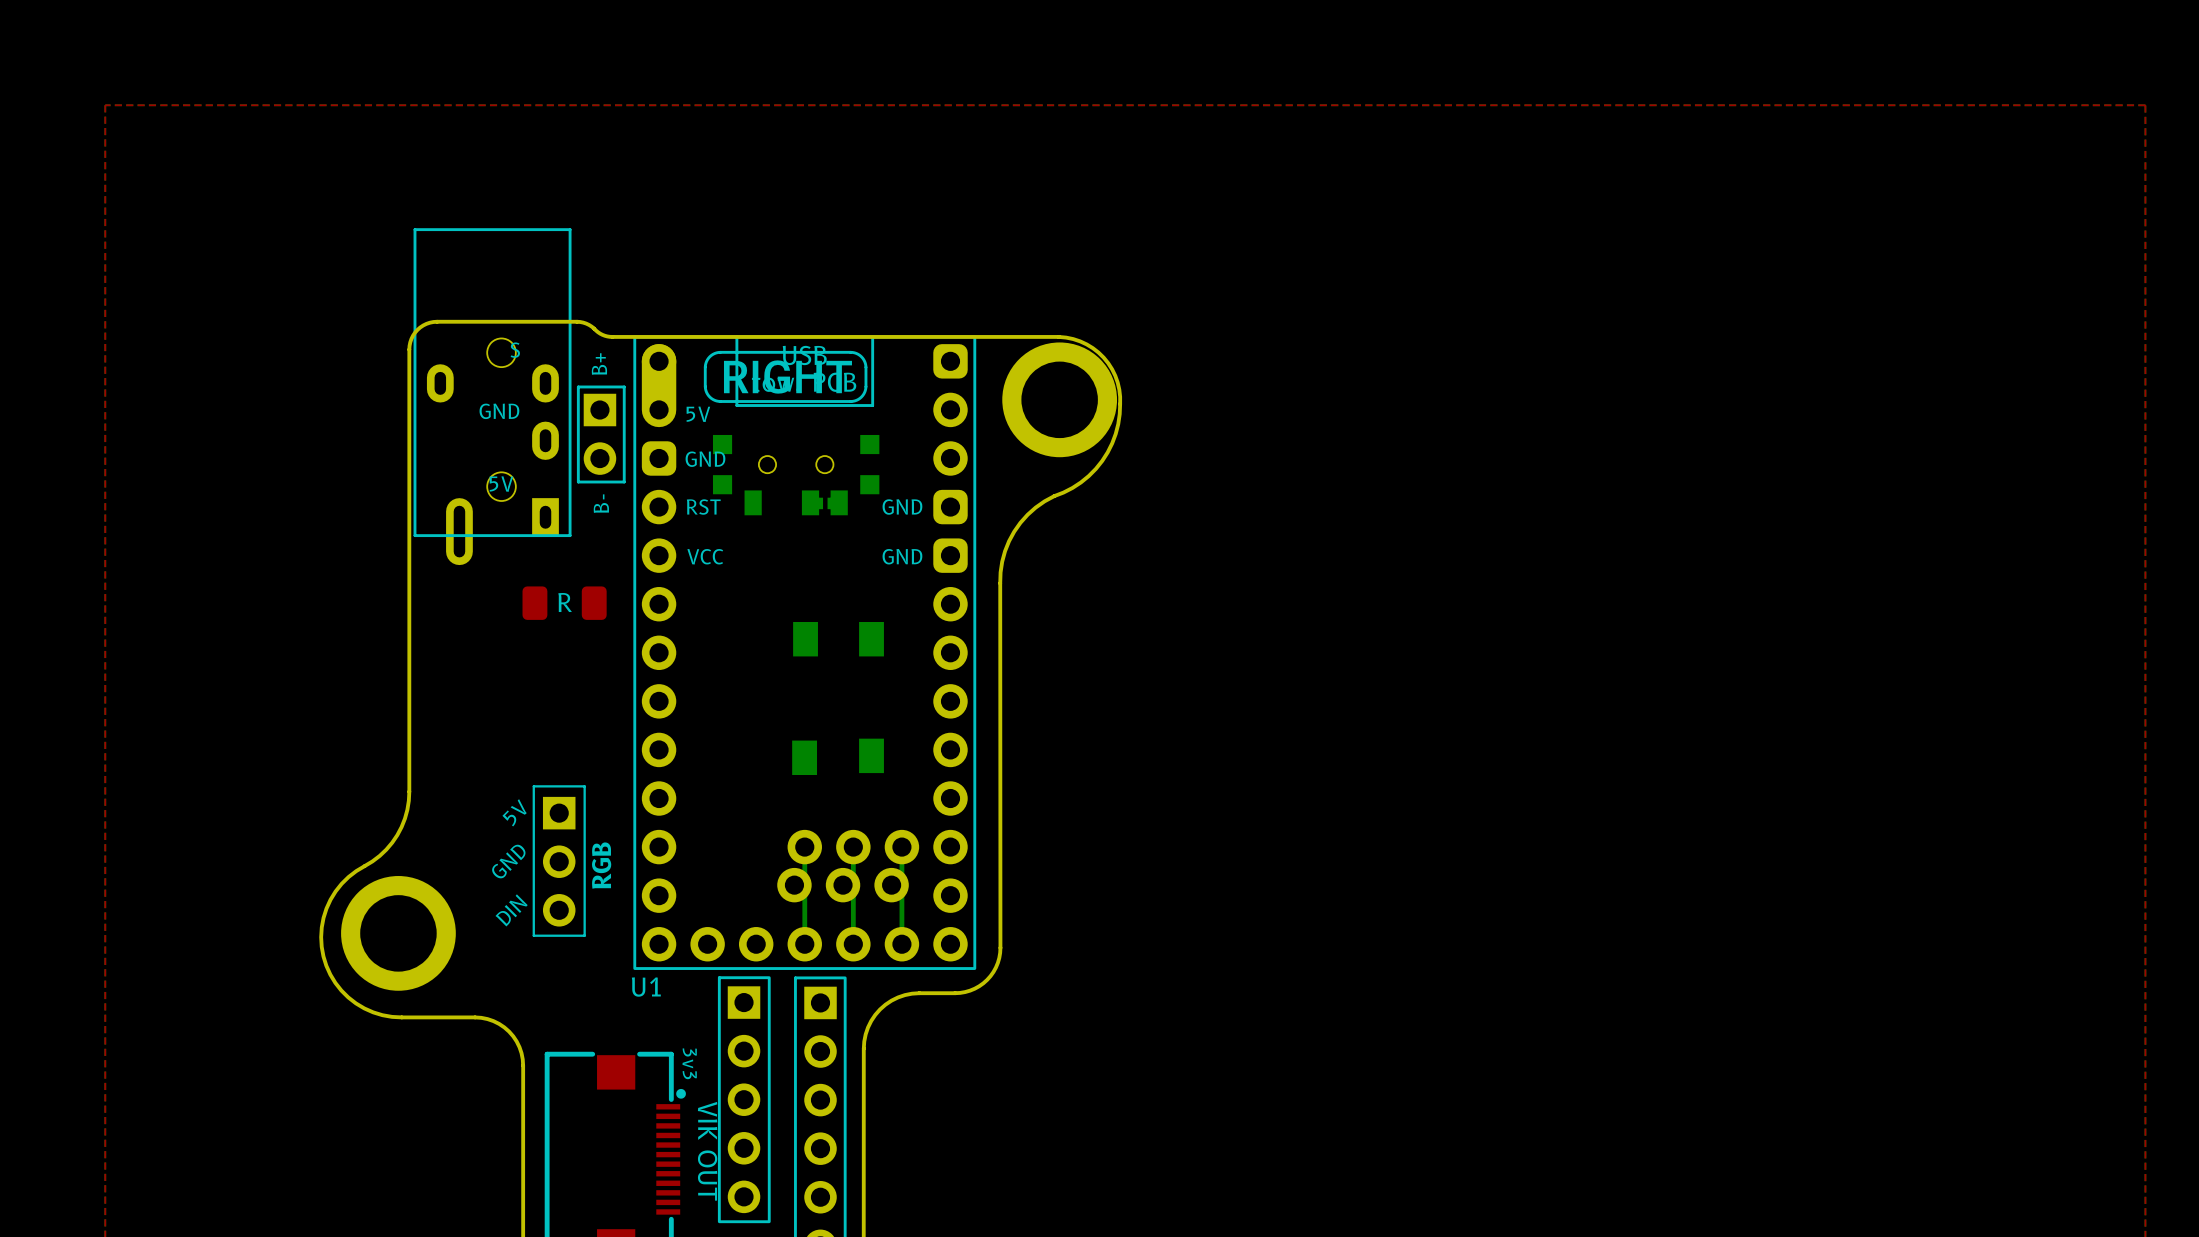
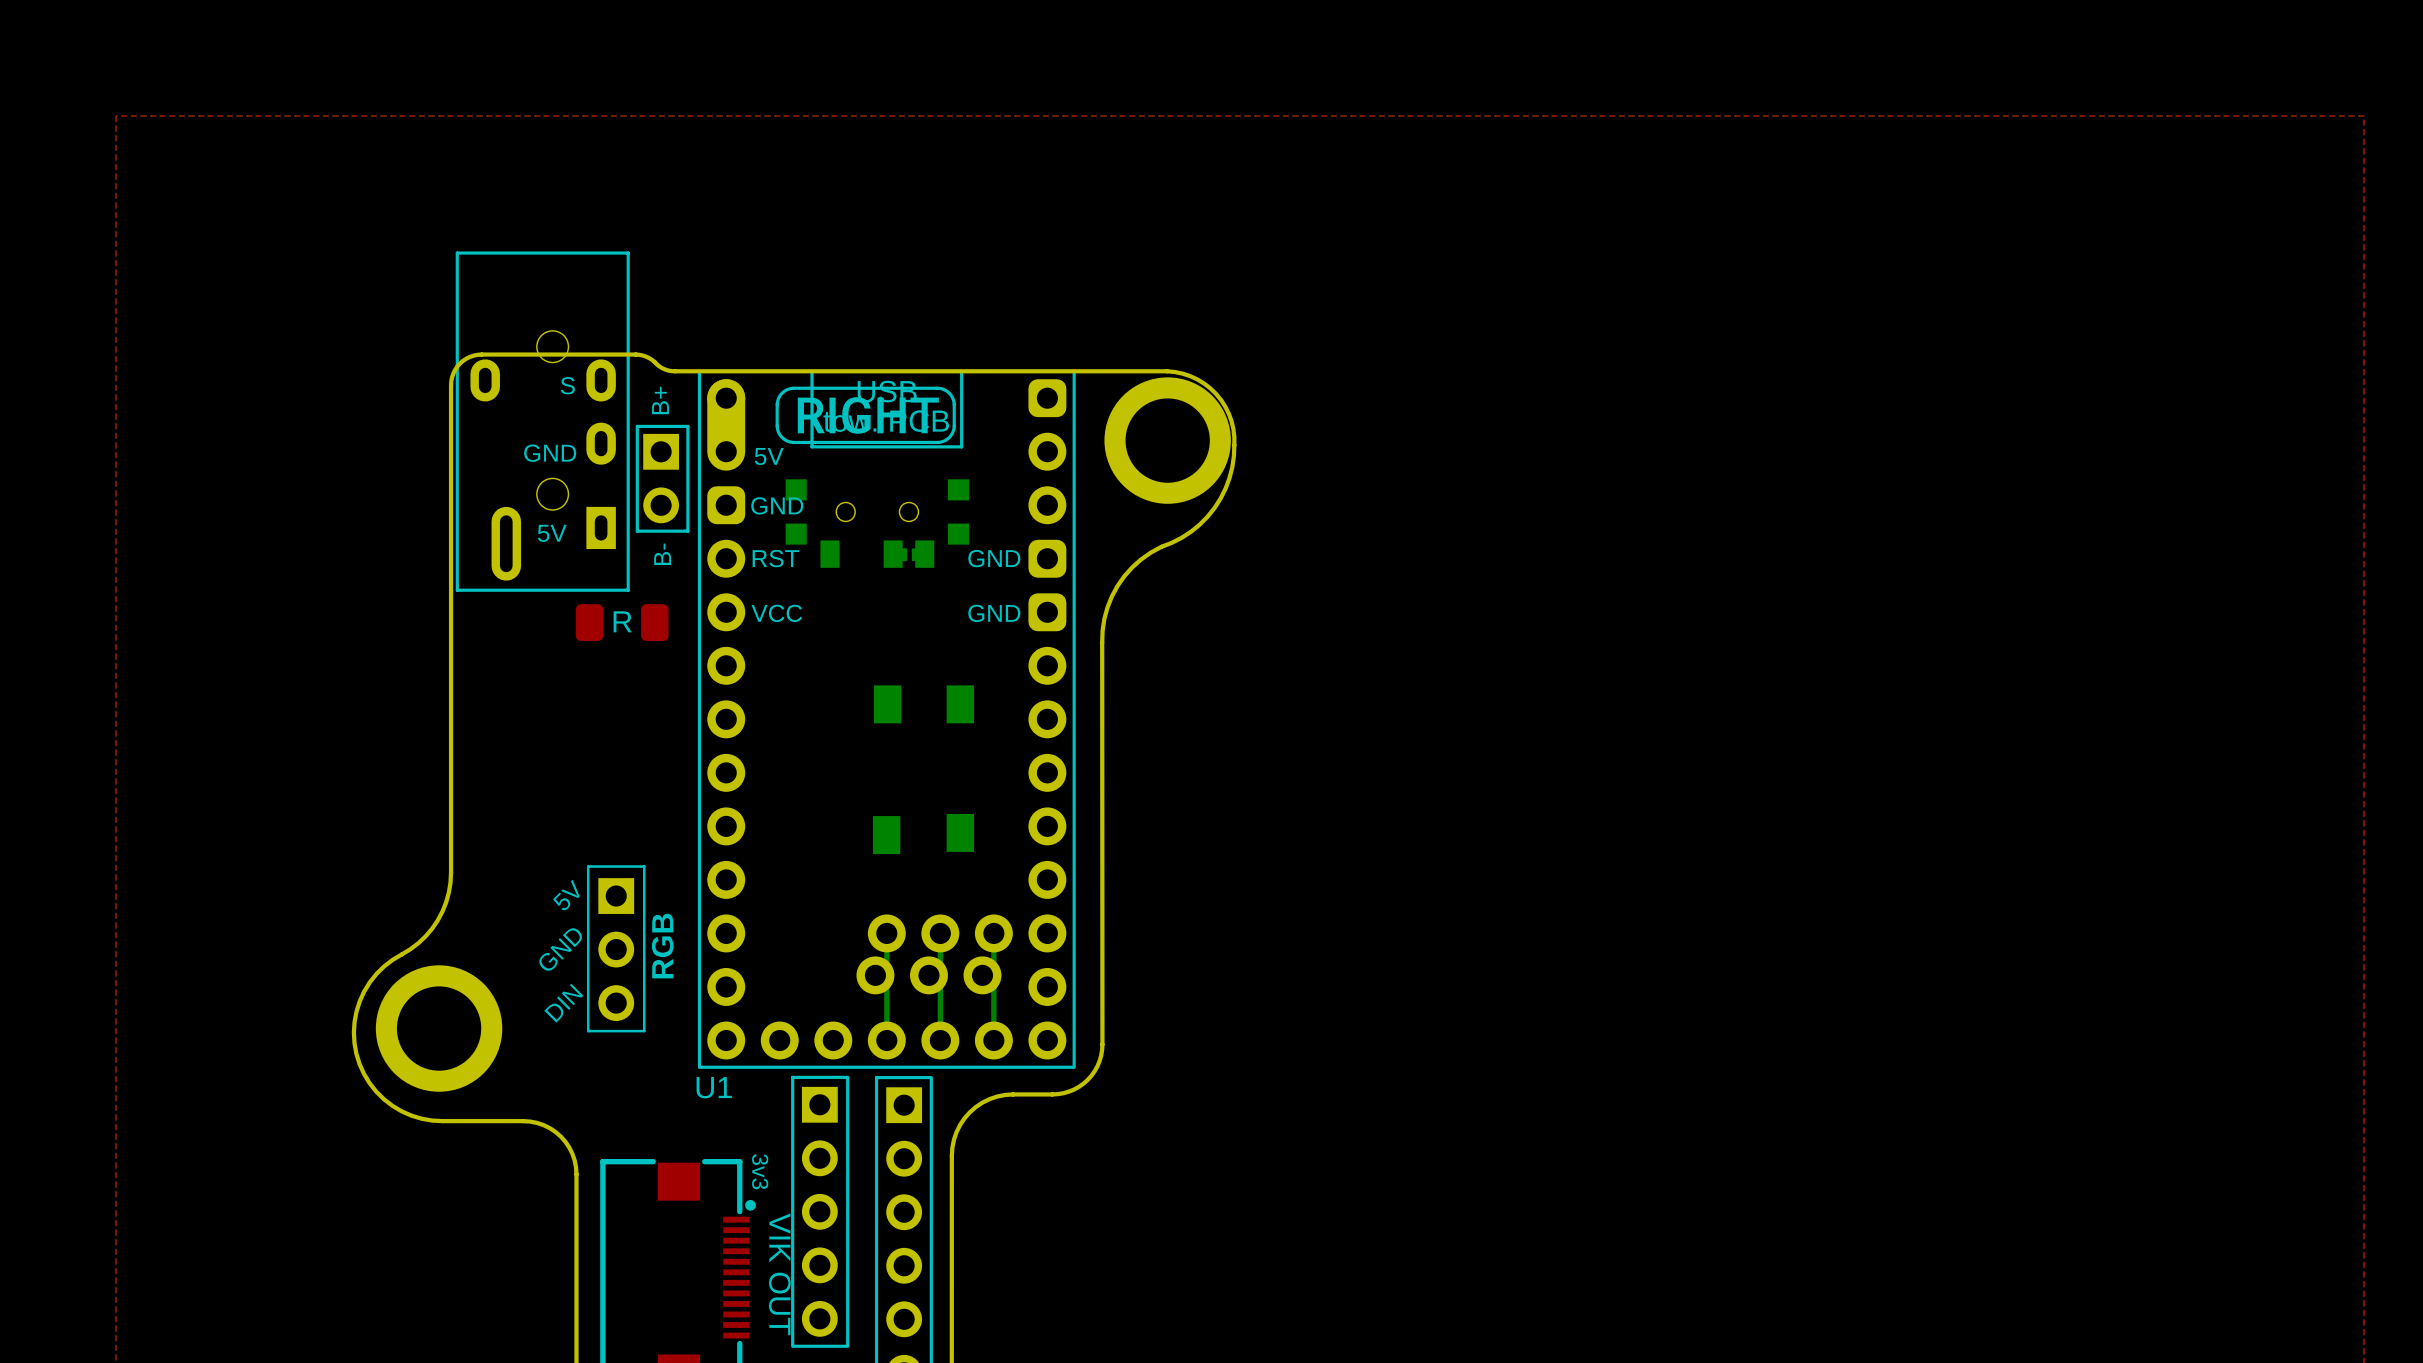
part position: (492, 451) -> (543, 455)
part position: (564, 603) -> (622, 622)

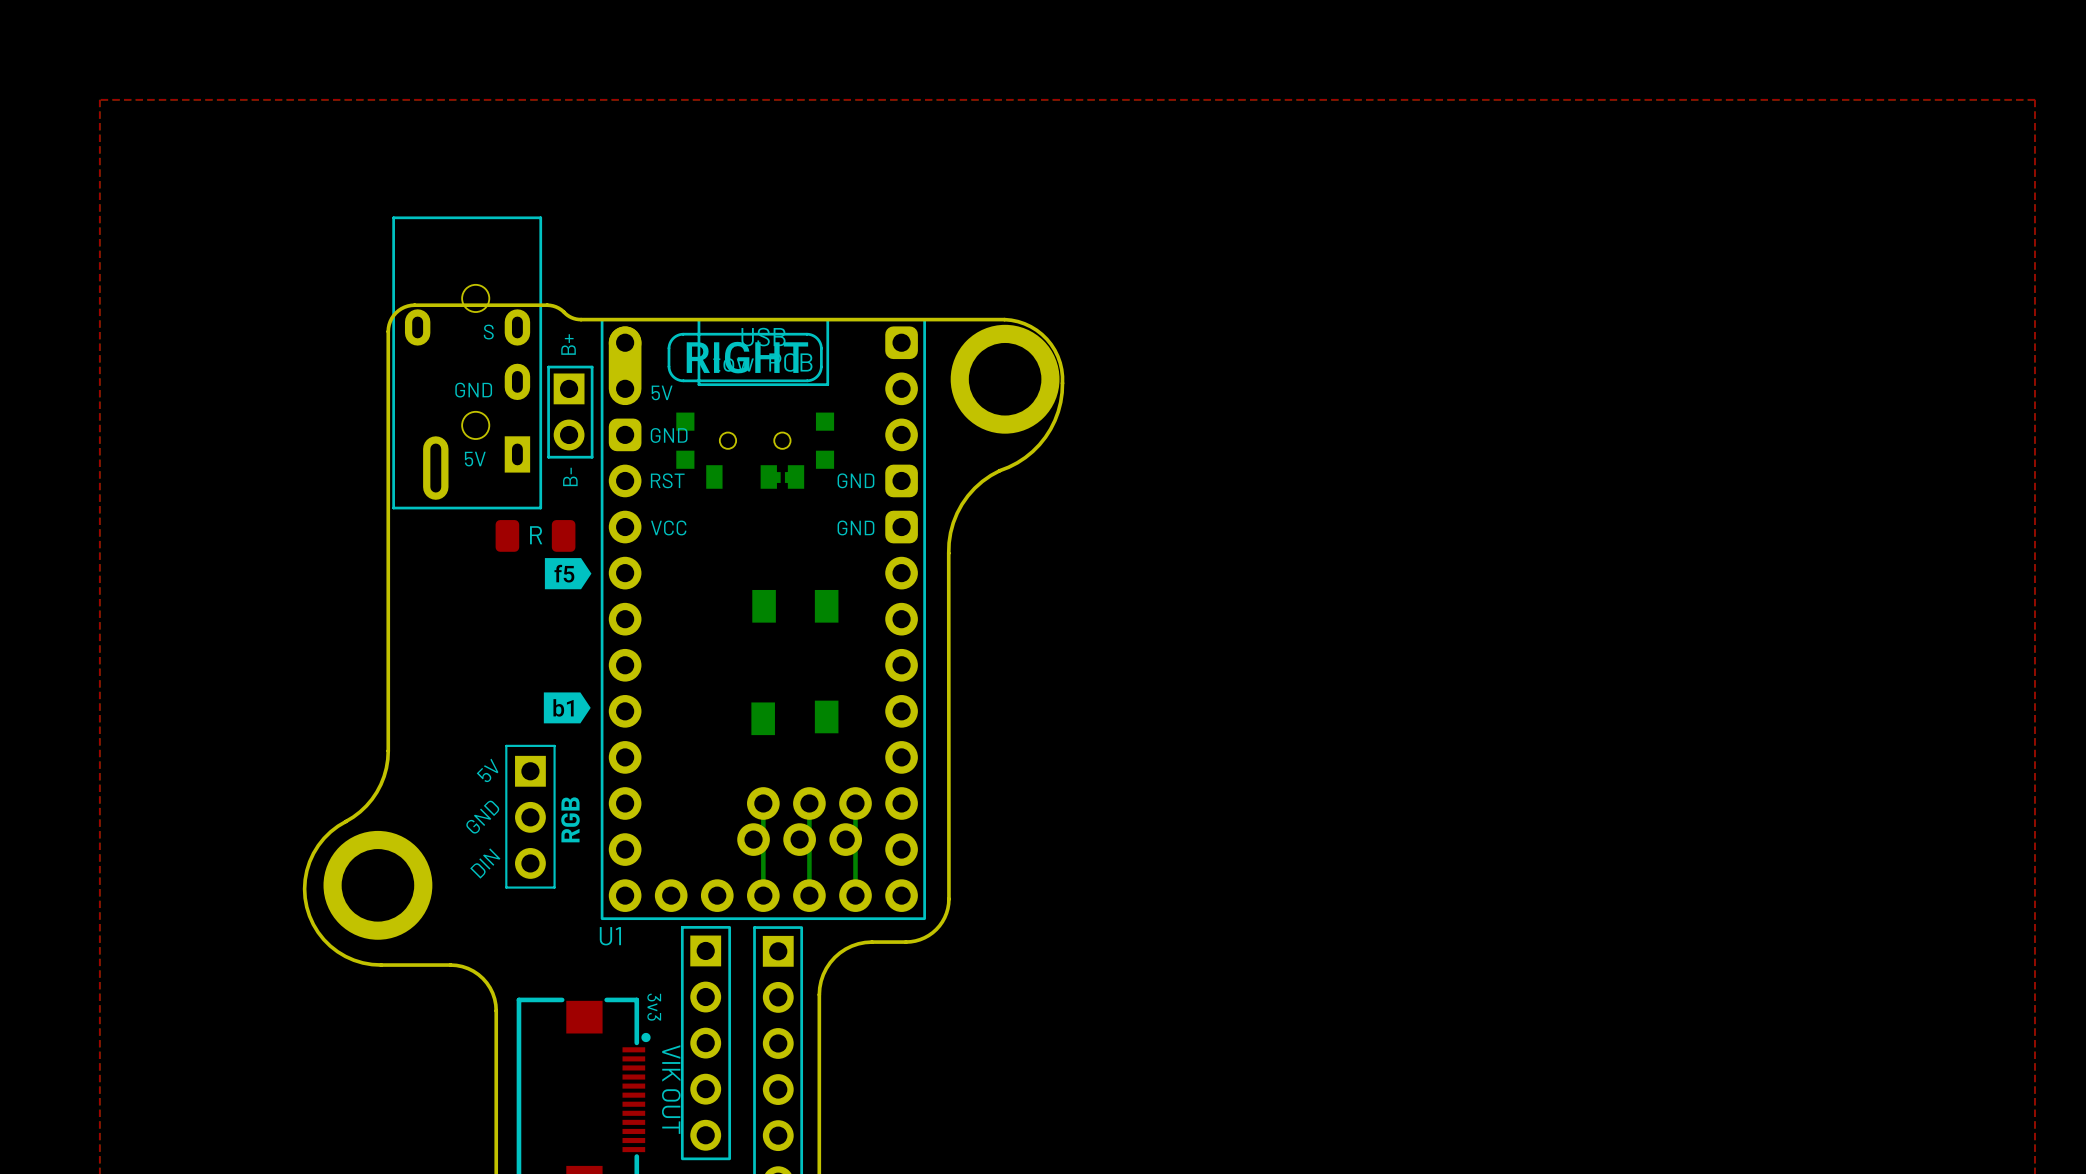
drawing: none -> [544, 558, 592, 590]
drawing: none -> [543, 692, 591, 724]

